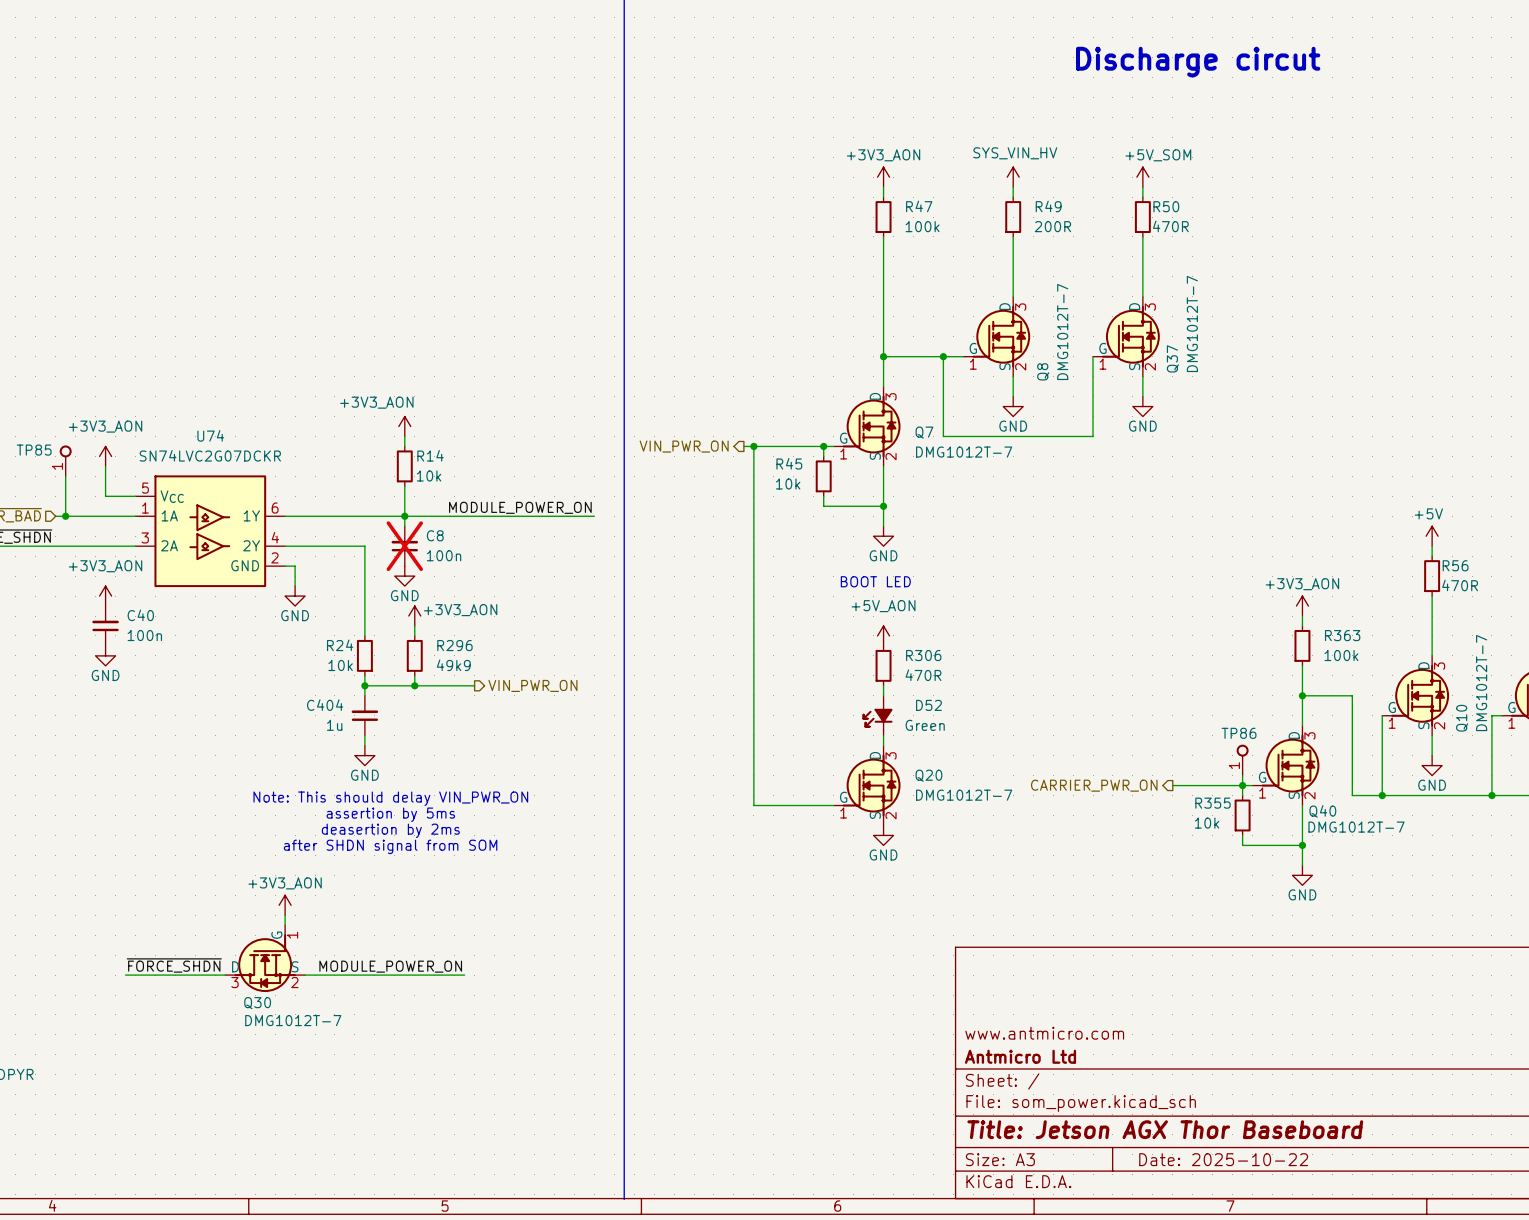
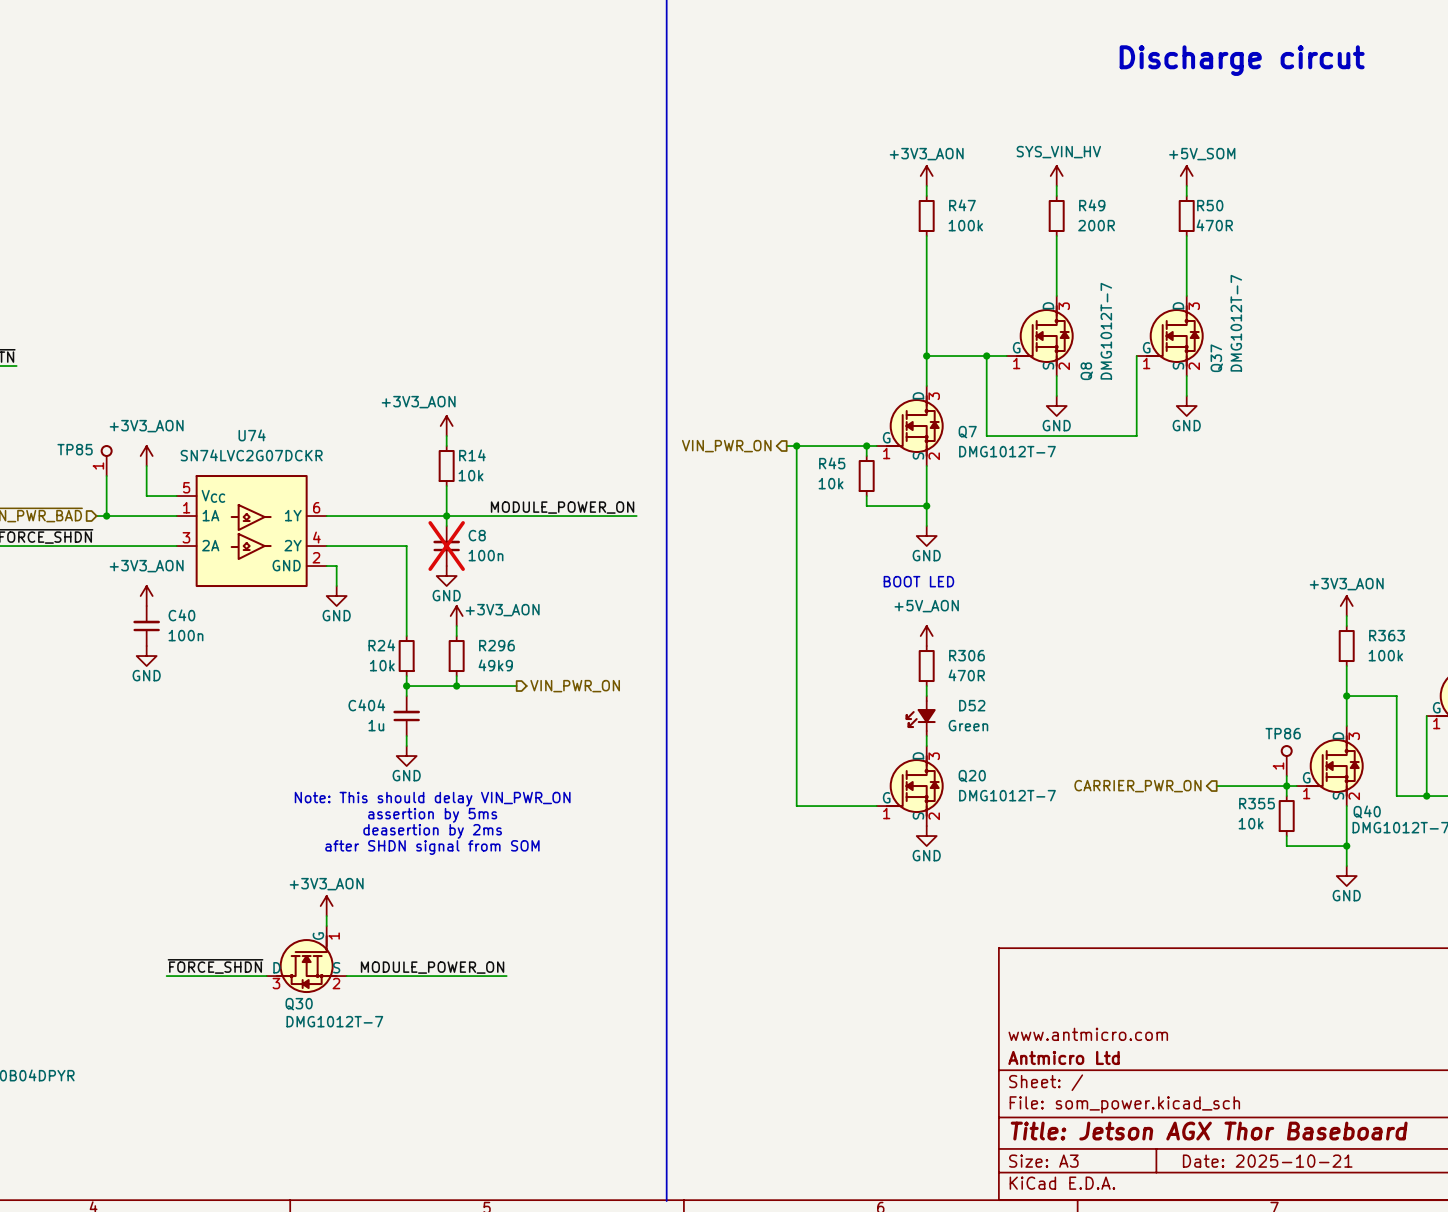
title block: Date: 2025-10-22 (1223, 1159) -> Date: 2025-10-21 (1267, 1161)

